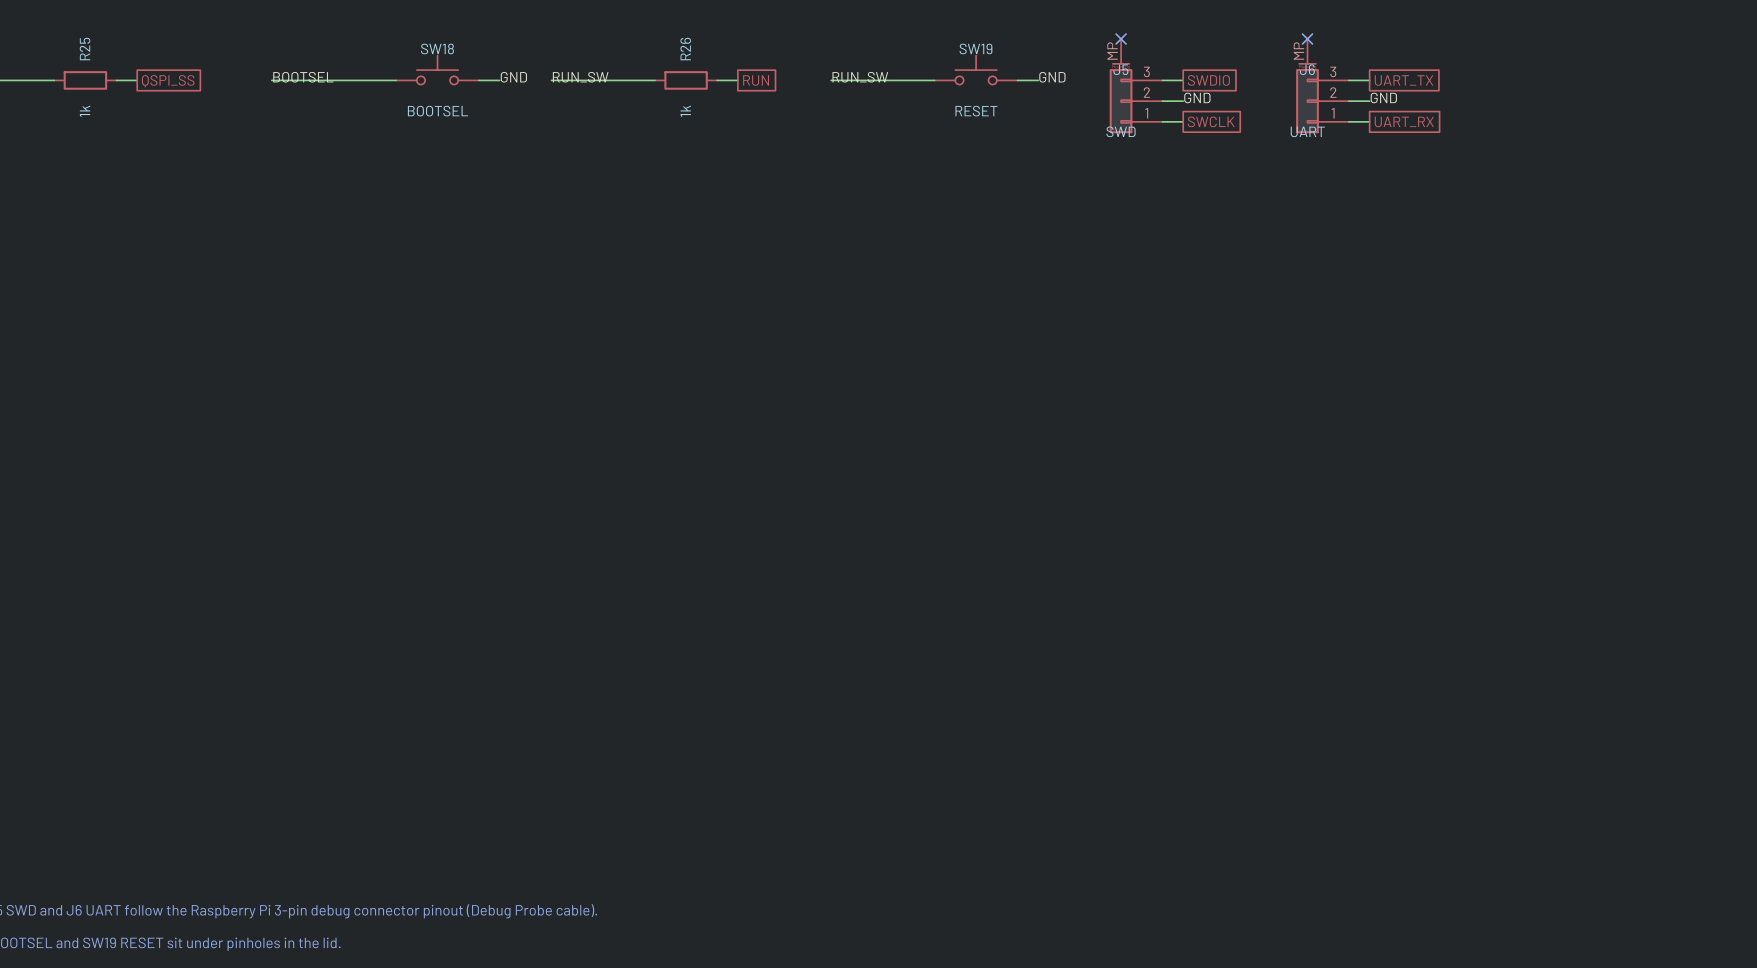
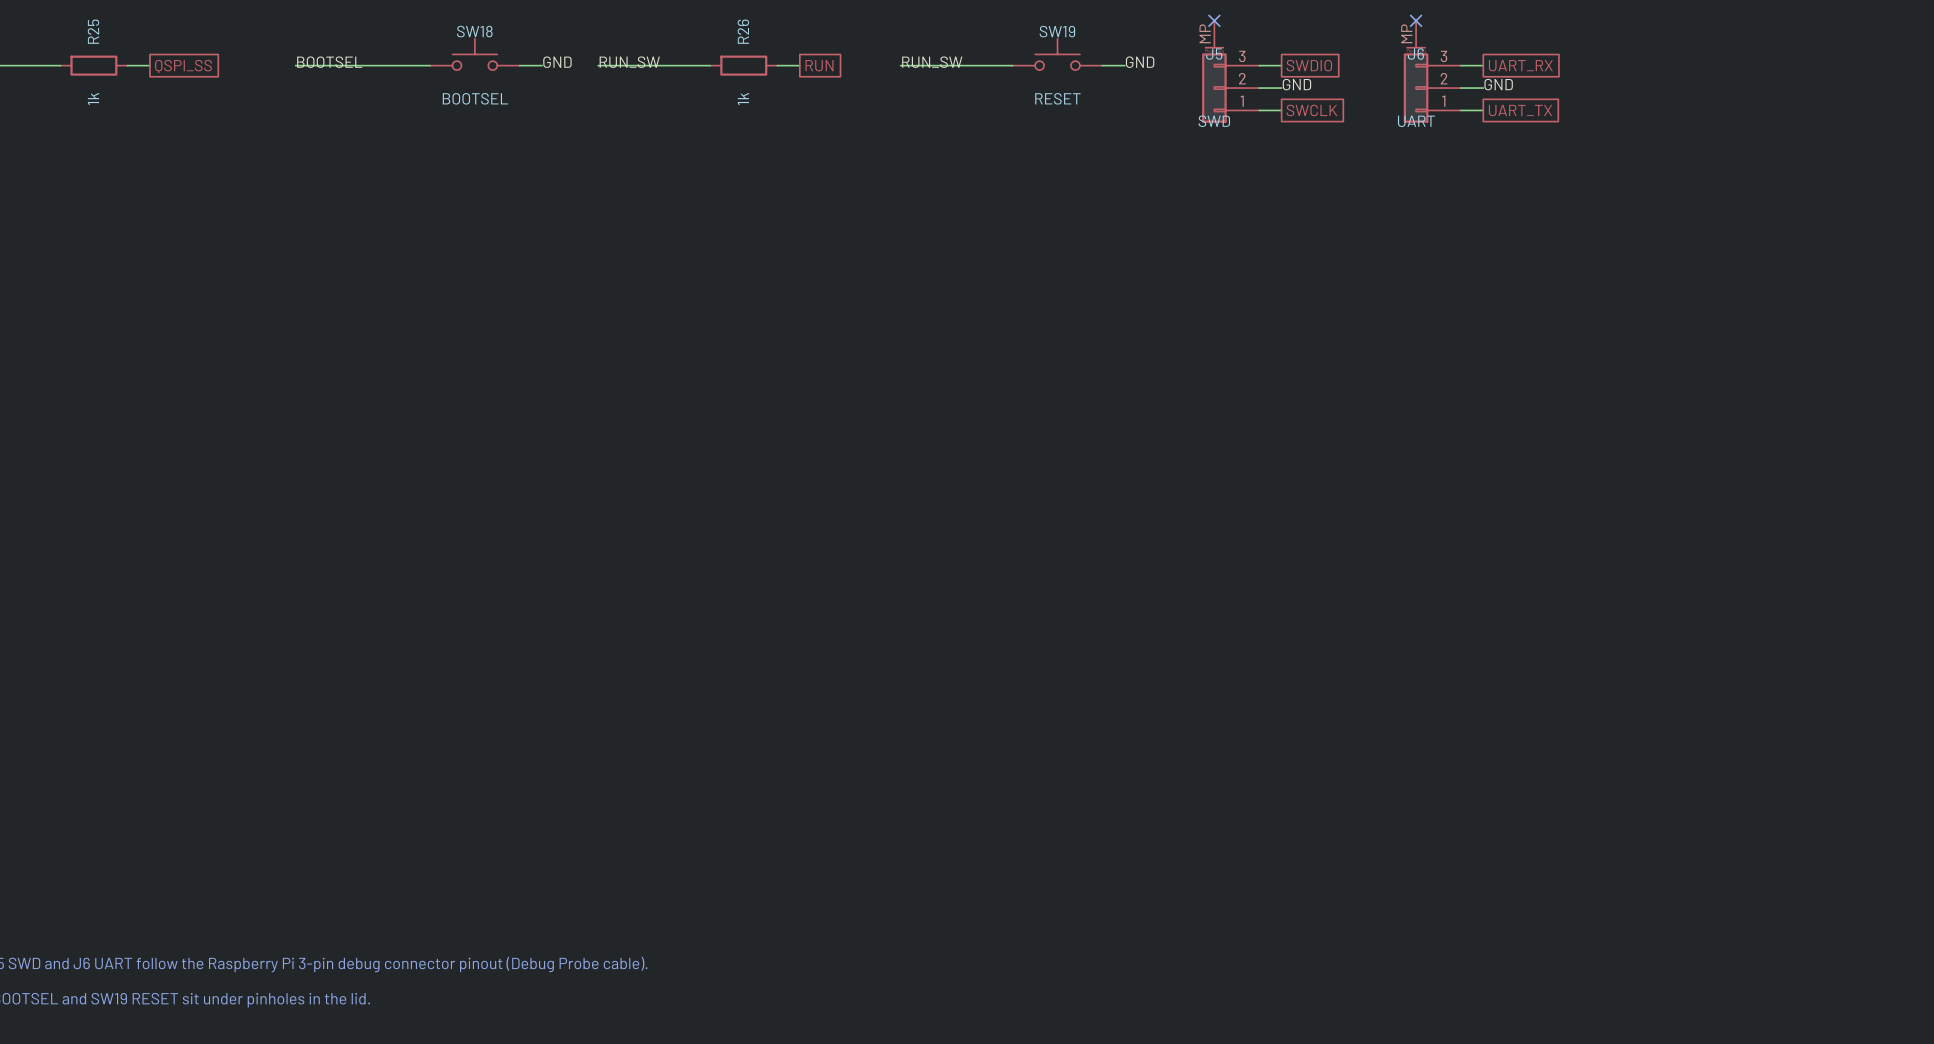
global label: UART_TX (1404, 80) -> UART_RX (1520, 65)
global label: UART_RX (1404, 121) -> UART_TX (1520, 110)

